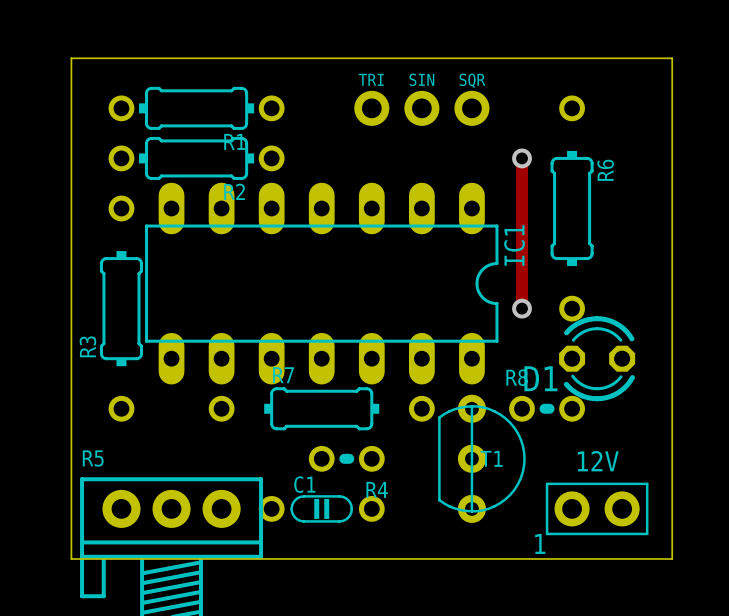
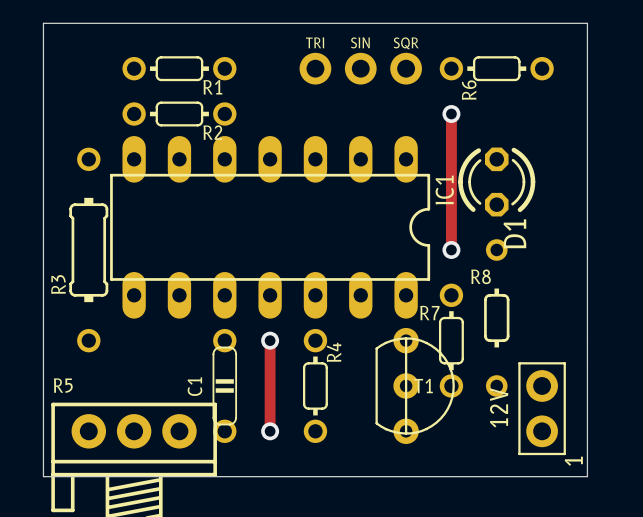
R1 footprint: [108, 86, 285, 130] -> [122, 56, 237, 82]
R6 footprint: [550, 95, 594, 322] -> [439, 56, 554, 82]
R2 footprint: [108, 136, 285, 180] -> [122, 101, 237, 127]
R6 name position: R6 (605, 170) -> R6 (469, 90)
D1 rotation: 0° (597, 358) -> 90° counterclockwise (496, 182)
D1 position: (597, 358) -> (496, 182)
R7 footprint: [208, 387, 435, 431] -> [438, 283, 464, 398]
R8 footprint: [509, 395, 585, 422] -> [484, 239, 510, 397]
track: none -> (270, 340) (270, 431)
via: none -> (270, 340)
R4 footprint: [308, 445, 385, 472] -> [302, 328, 328, 443]
R4 name position: R4 (377, 489) -> R4 (334, 352)
C1 footprint: [258, 495, 385, 523] -> [212, 328, 238, 443]
via: none -> (270, 431)
12V rotation: 0° (597, 508) -> 90° counterclockwise (542, 408)

